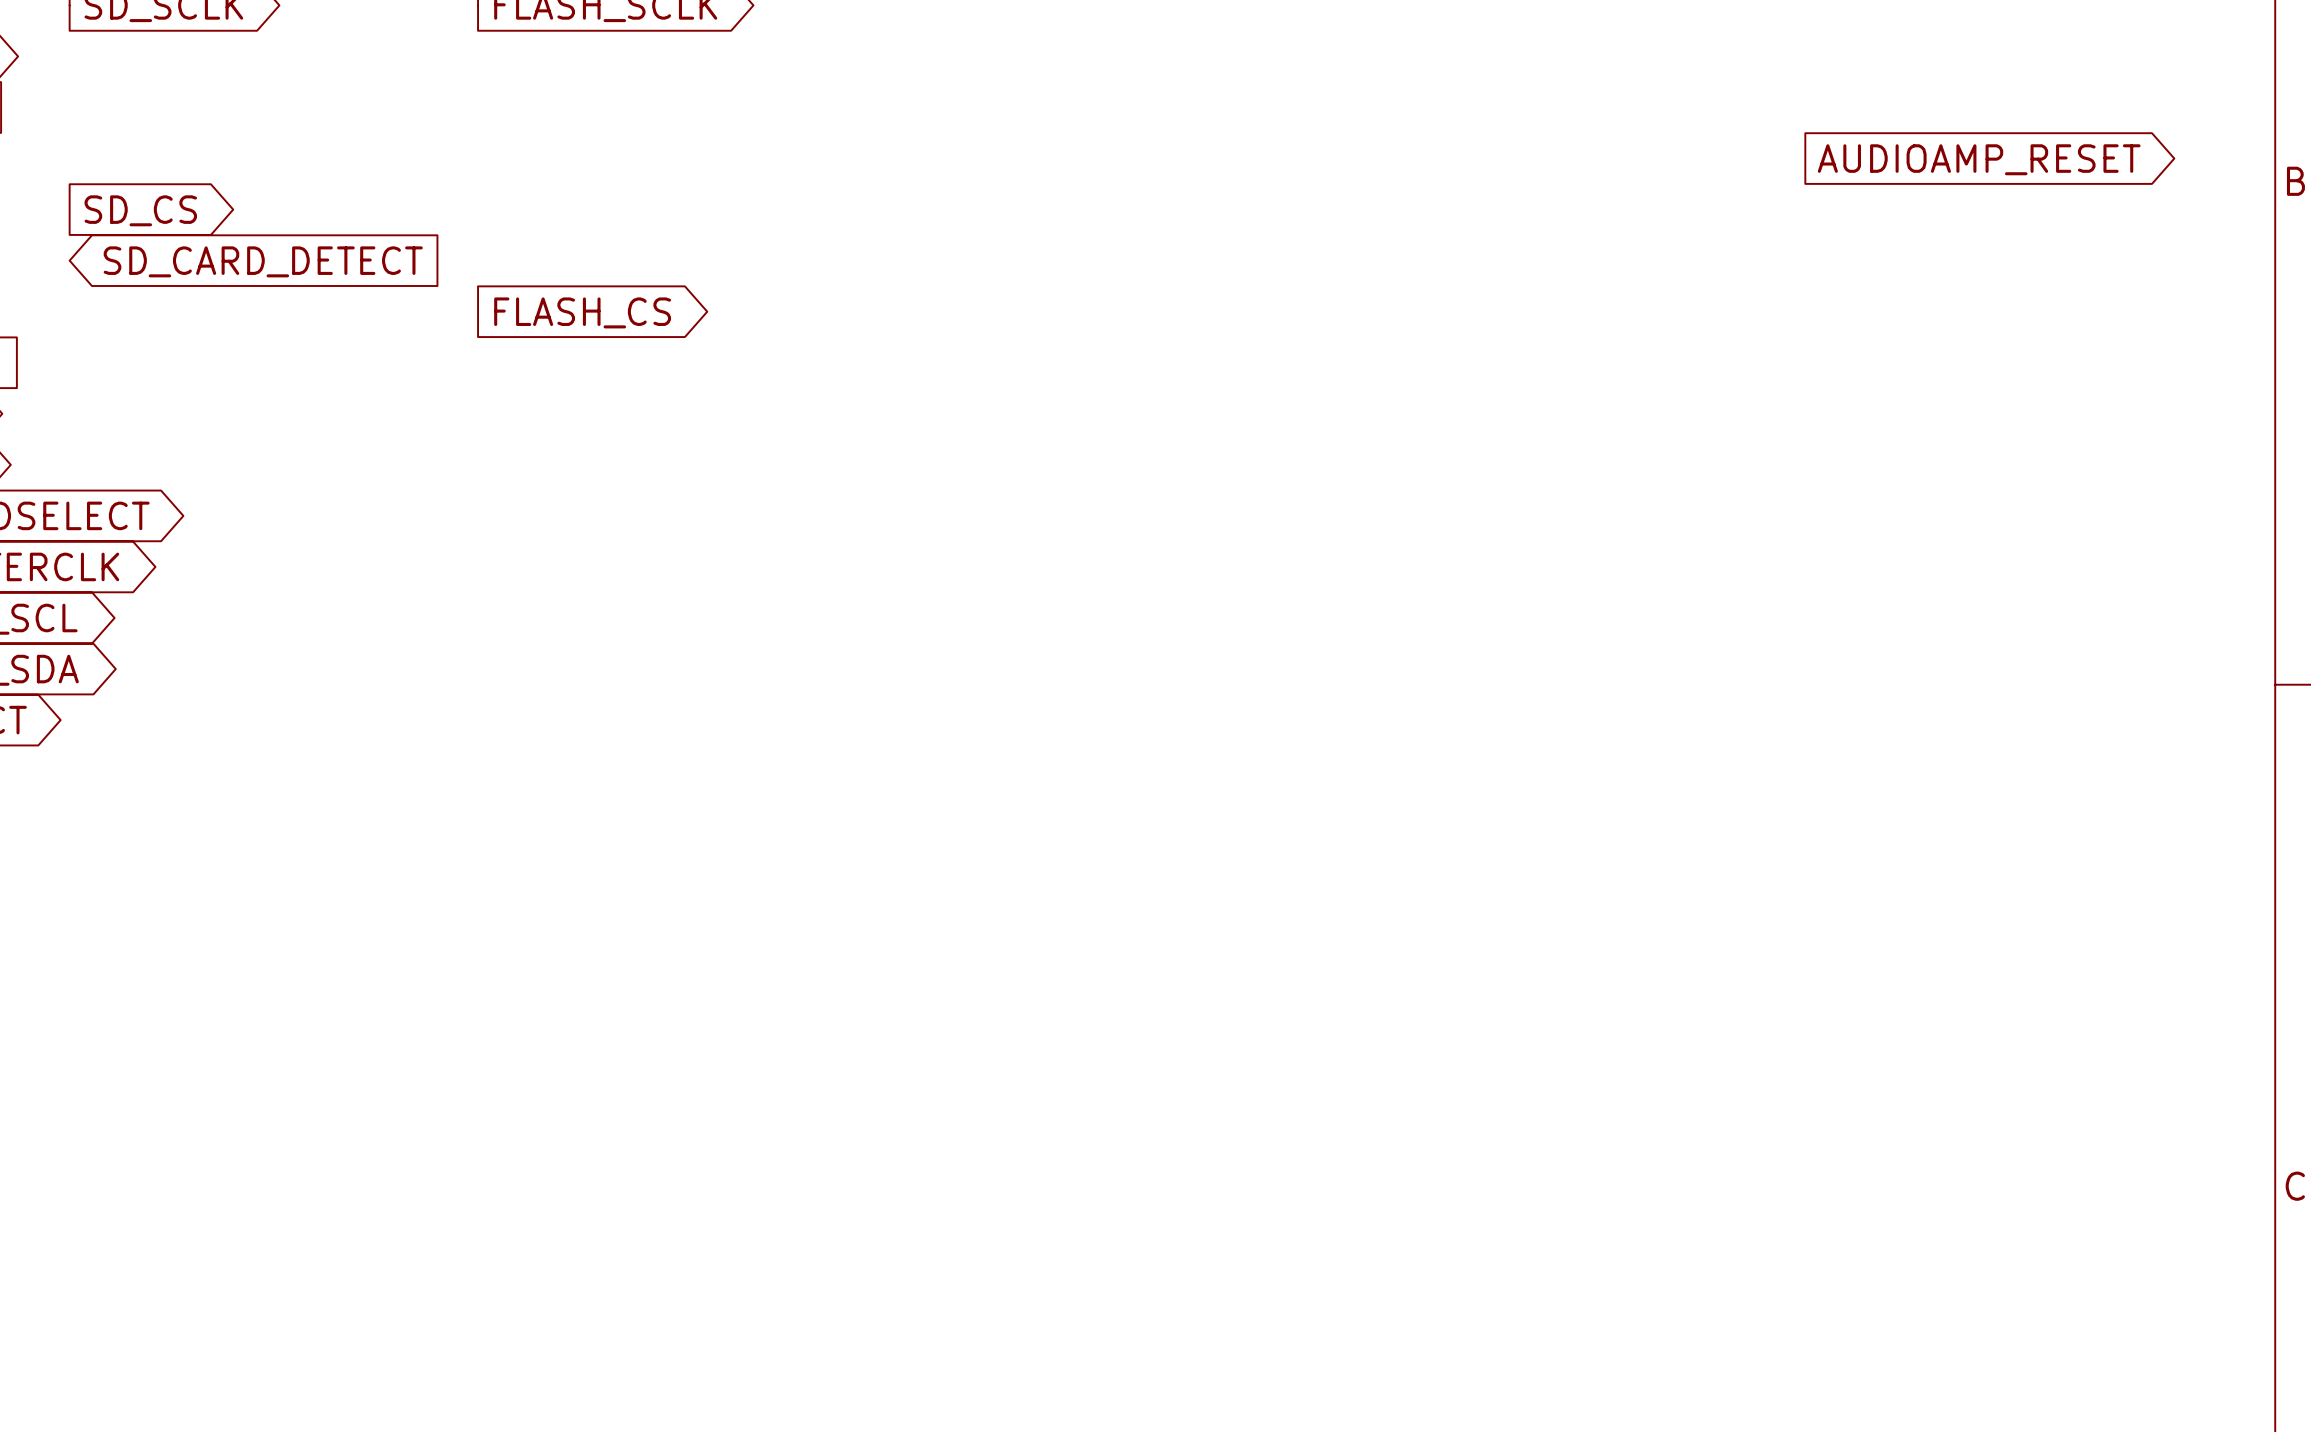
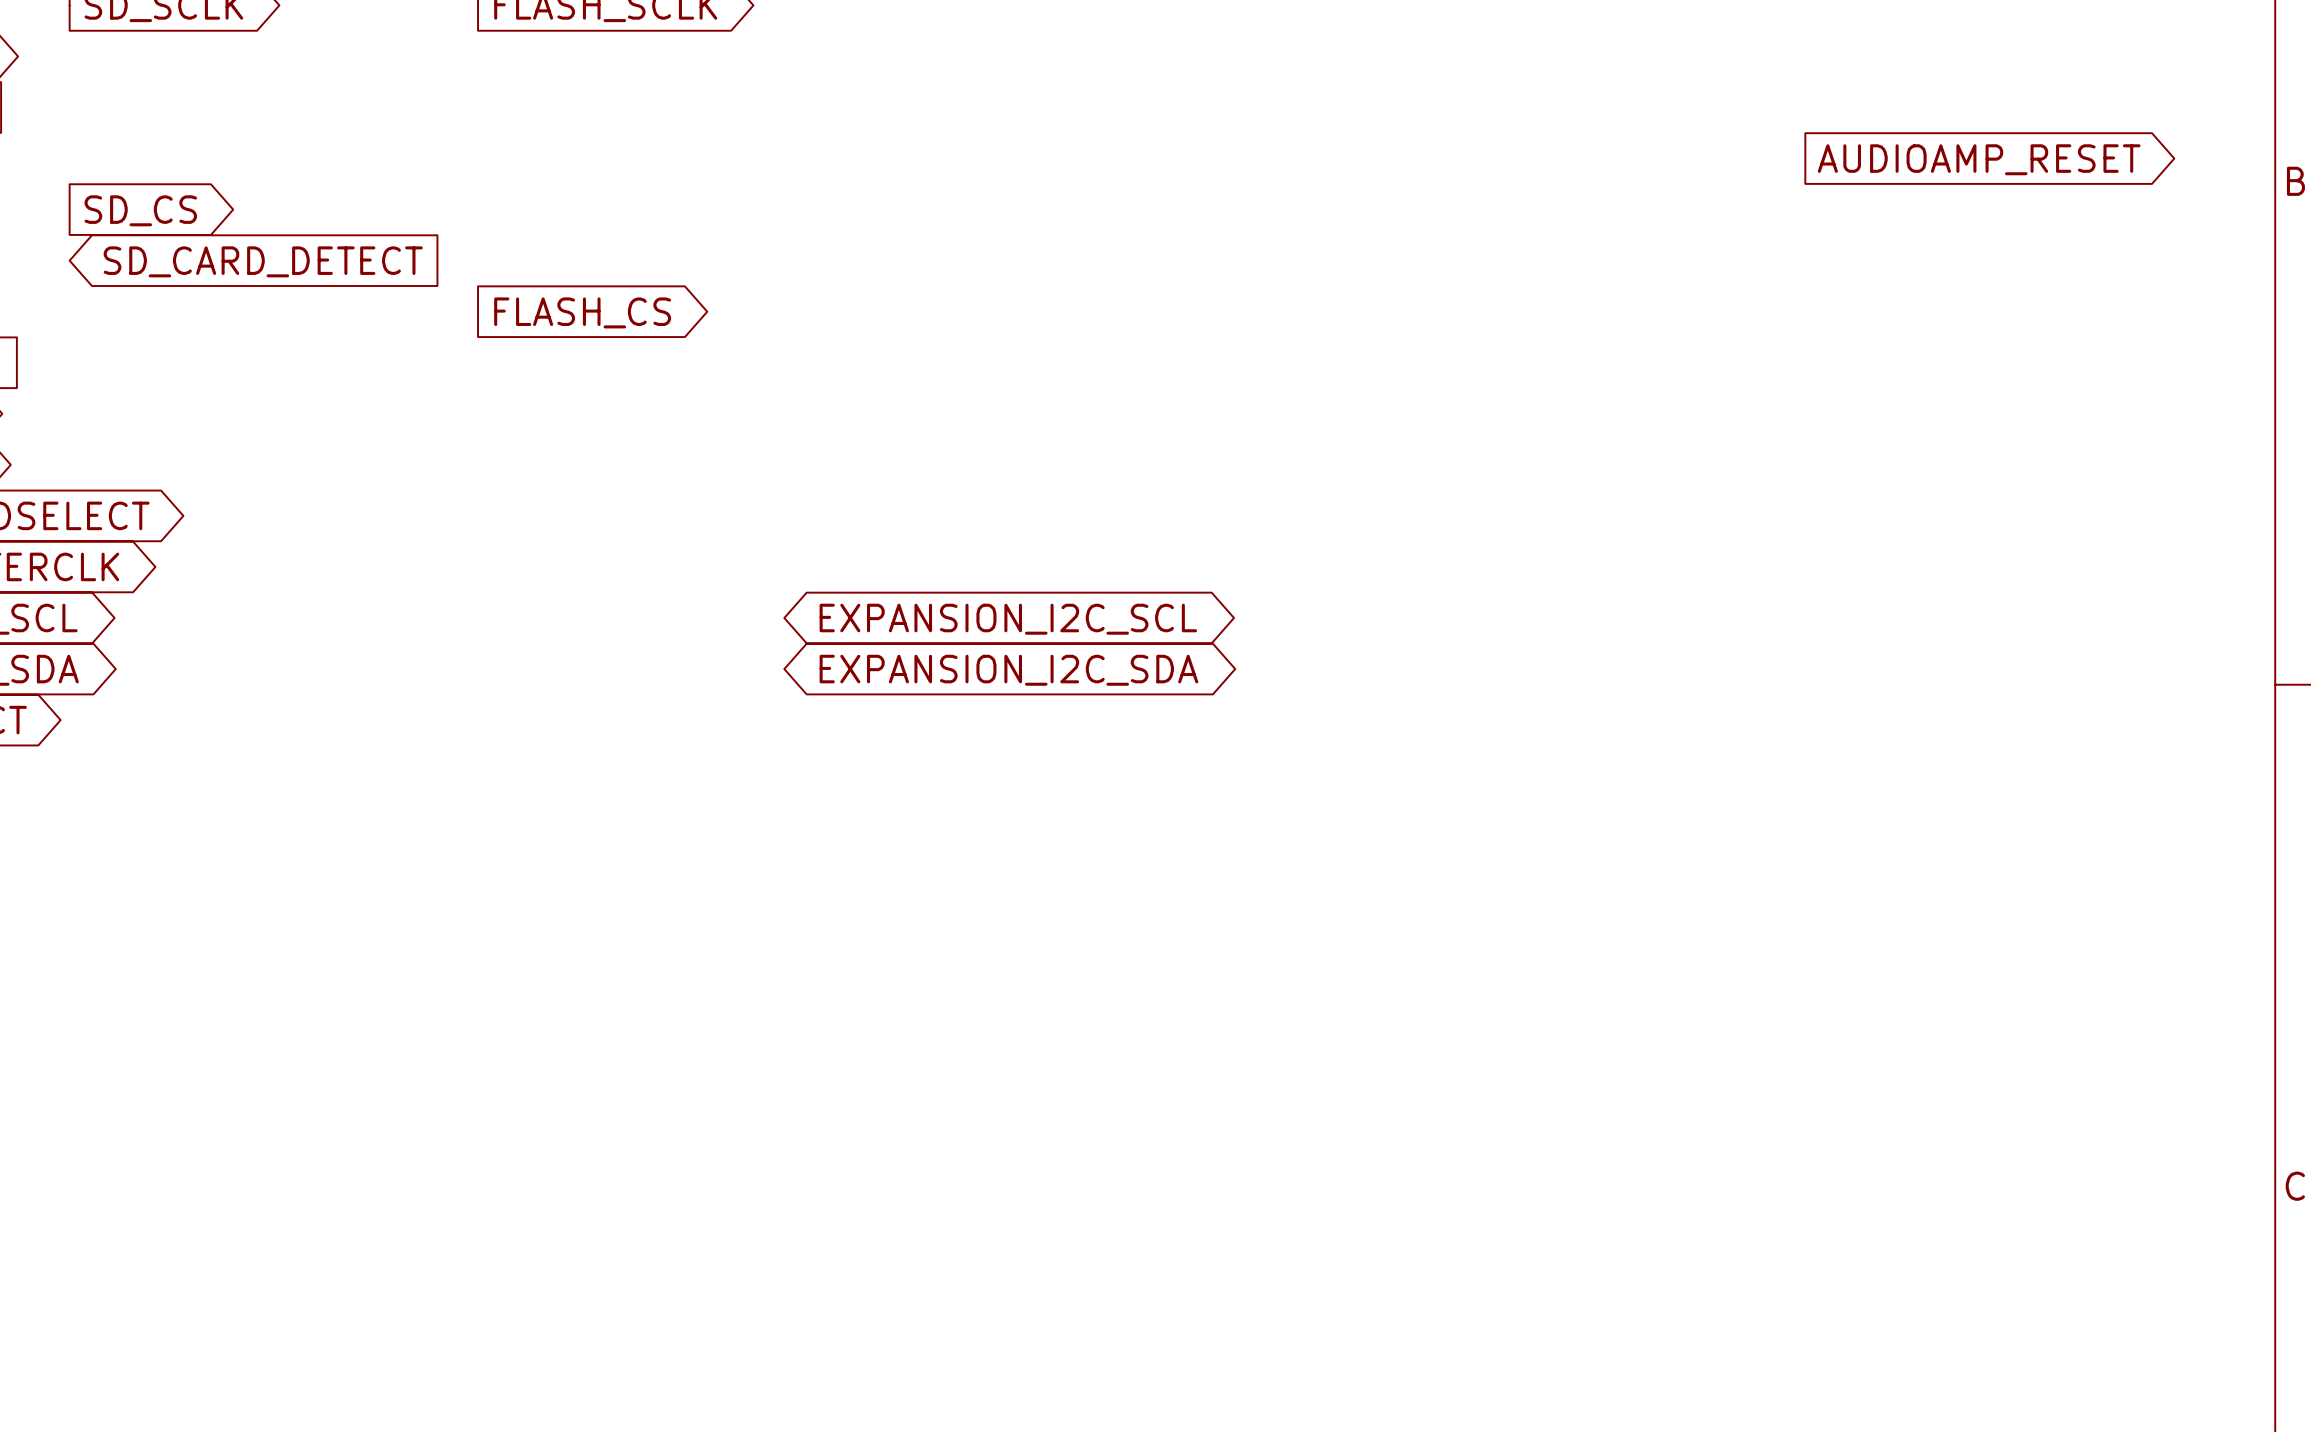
global label: none -> EXPANSION_I2C_SCL (1008, 619)
global label: none -> EXPANSION_I2C_SDA (1008, 670)

